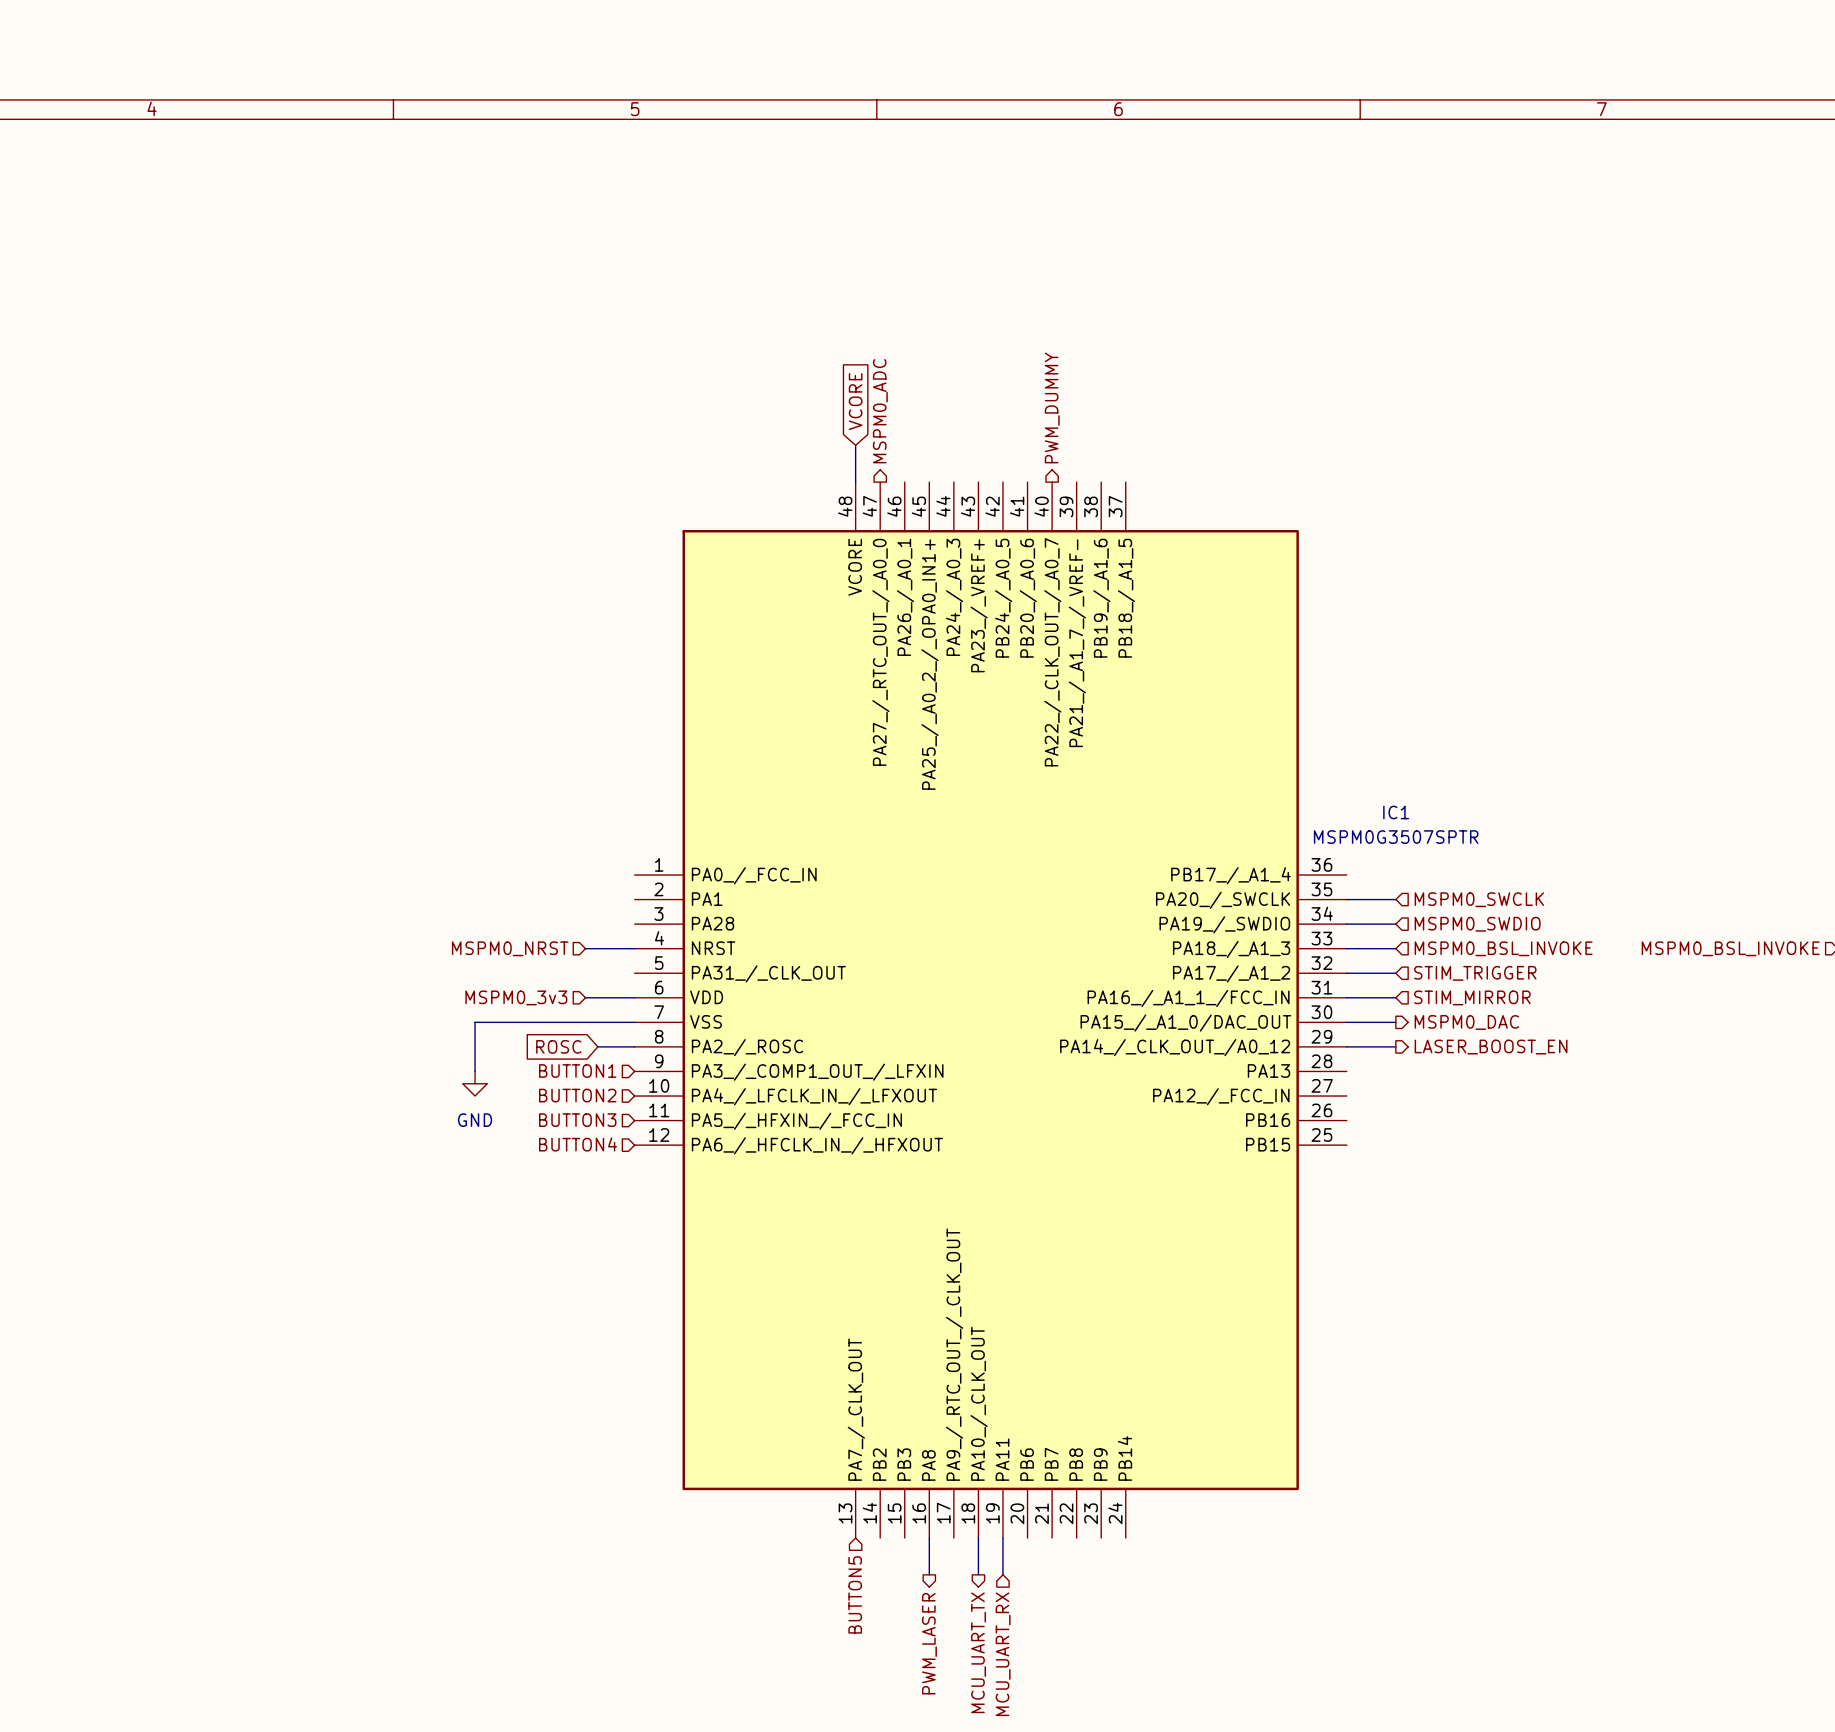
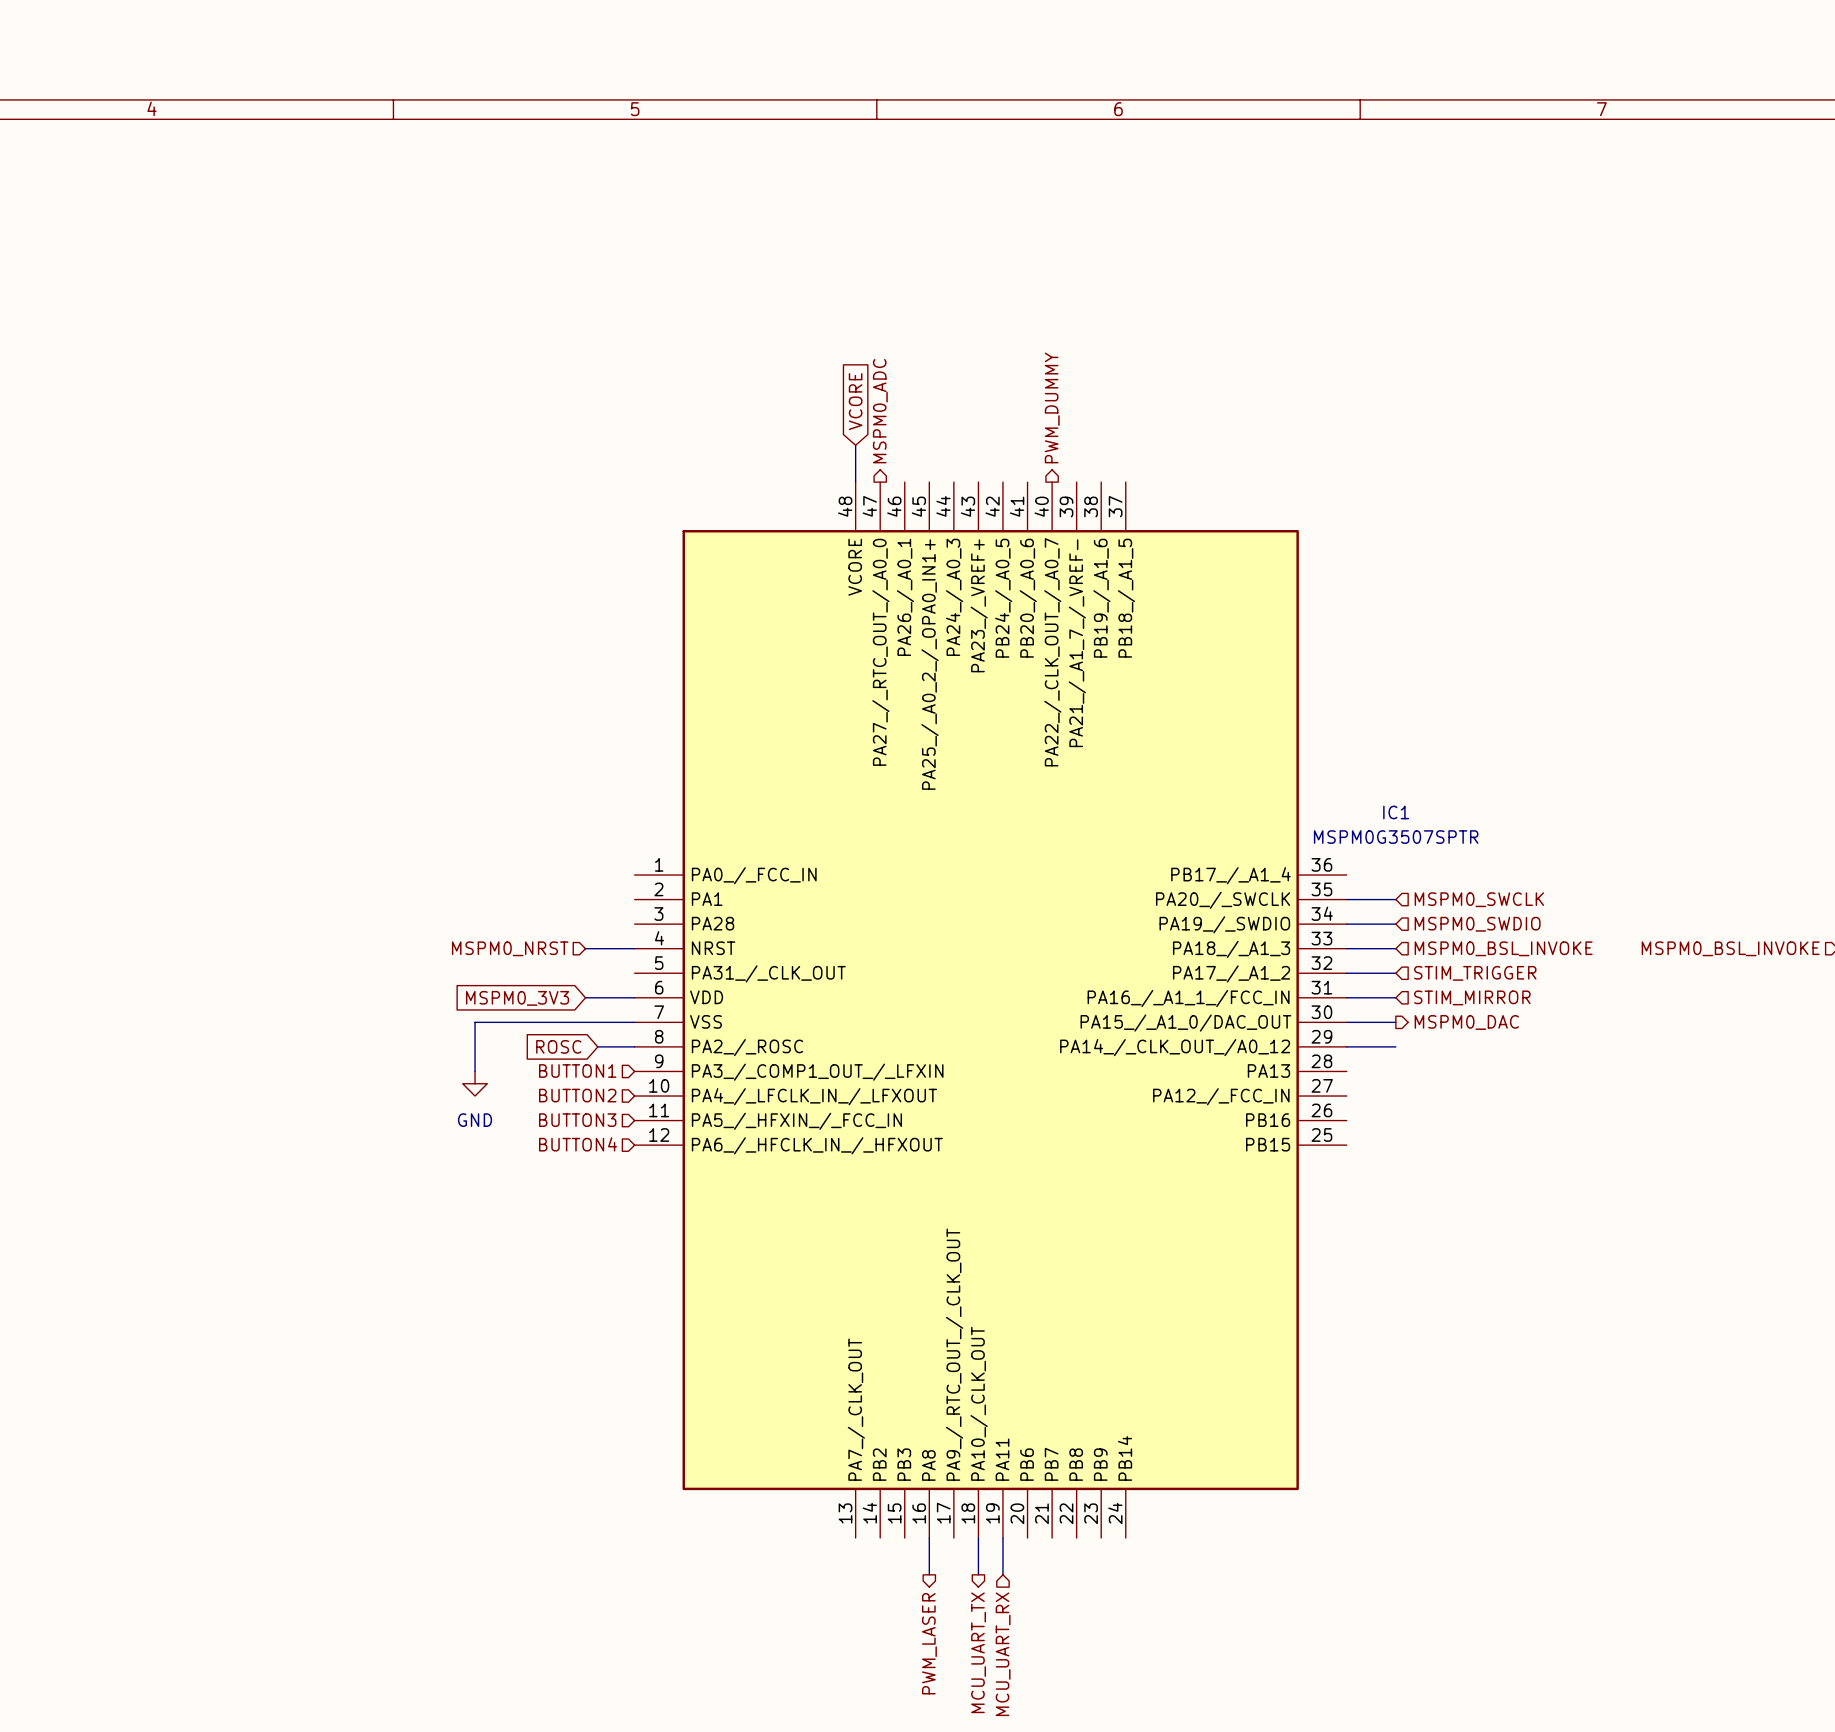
hierarchical label: MSPM0_3v3 (516, 997) -> none
global label: none -> MSPM0_3V3 (517, 998)
hierarchical label: LASER_BOOST_EN (1491, 1047) -> none
hierarchical label: BUTTON5 (855, 1594) -> none

